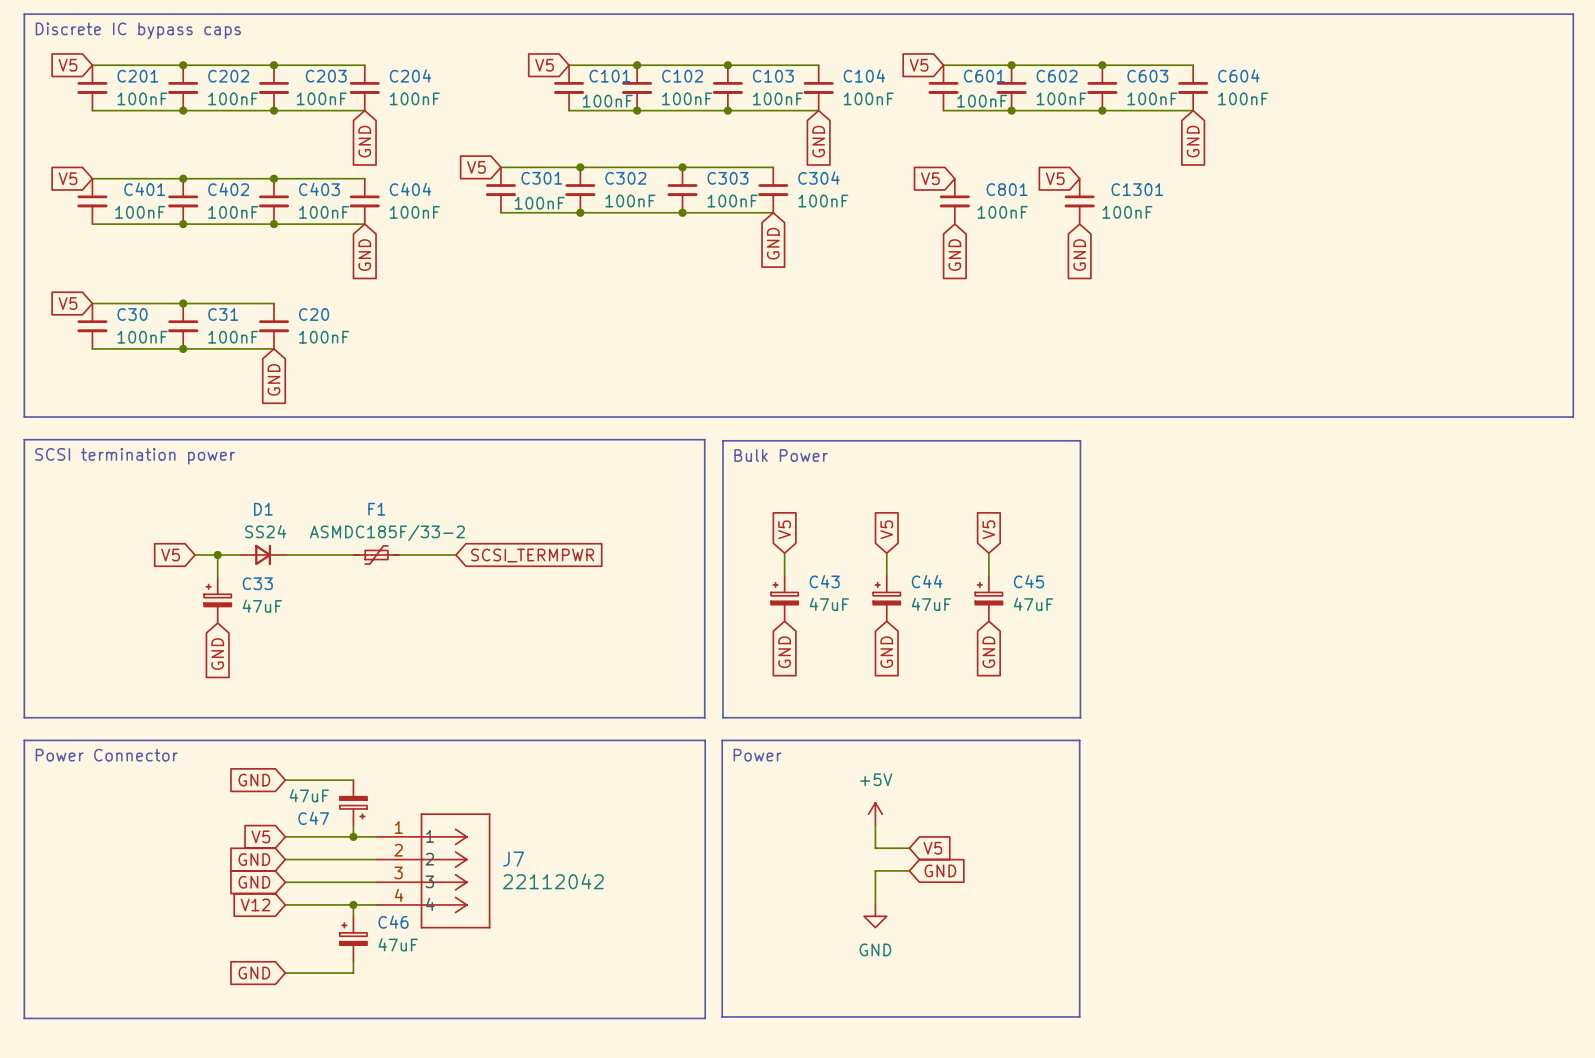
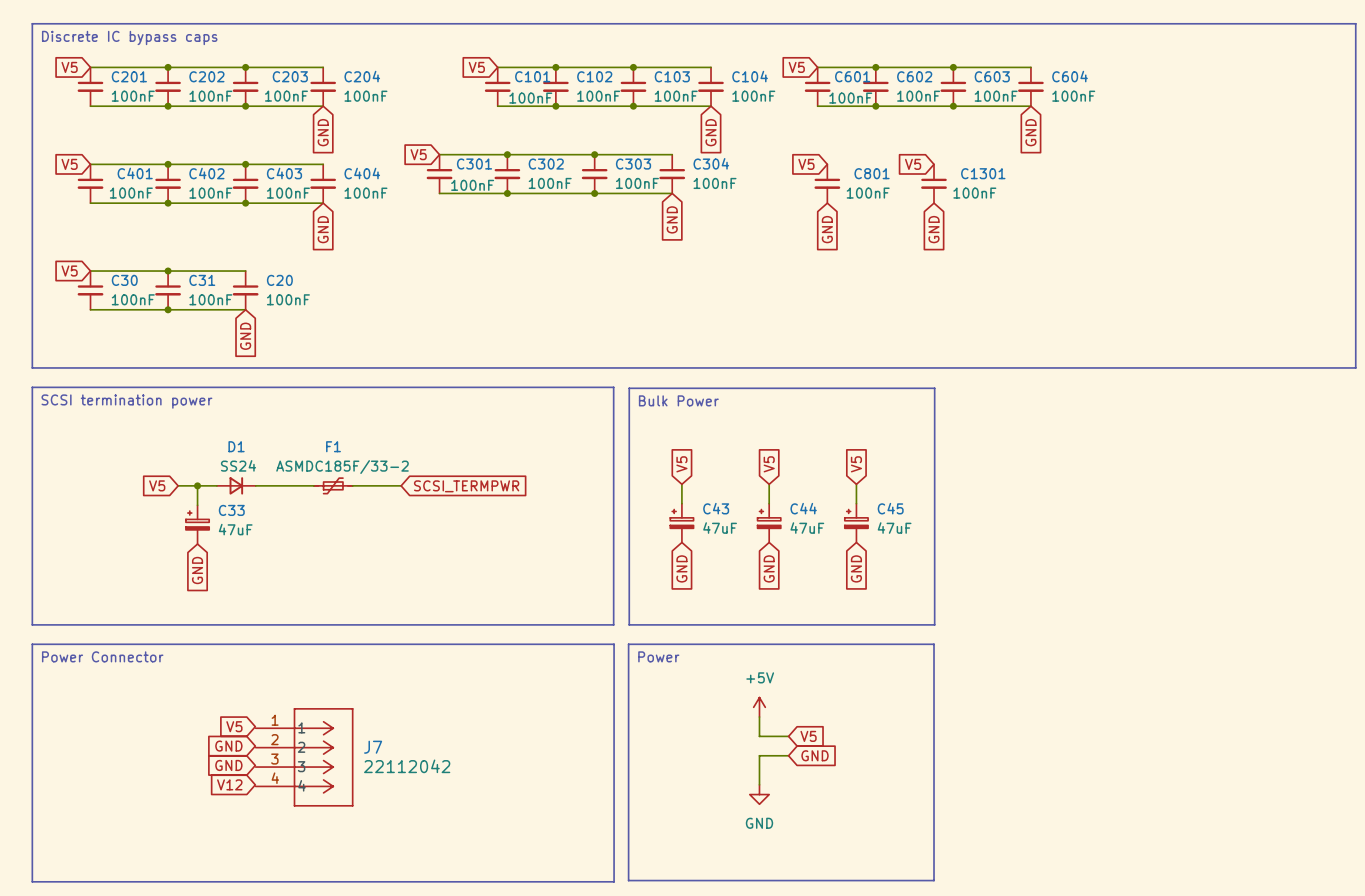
global label: GND (254, 780) -> none
wire: (285, 780) (353, 780) -> none
C47: 47uF (353, 802) -> none
wire: (353, 825) (353, 836) -> none
wire: (285, 836) (376, 836) -> none
junction: (353, 836) -> none
wire: (285, 859) (376, 859) -> none
J7 position: (433, 870) -> (304, 757)
wire: (285, 882) (376, 882) -> none
wire: (285, 904) (376, 904) -> none
wire: (353, 904) (353, 916) -> none
junction: (353, 904) -> none
C46: 47uF (353, 939) -> none
wire: (353, 961) (353, 973) (285, 973) -> none
global label: GND (254, 973) -> none

